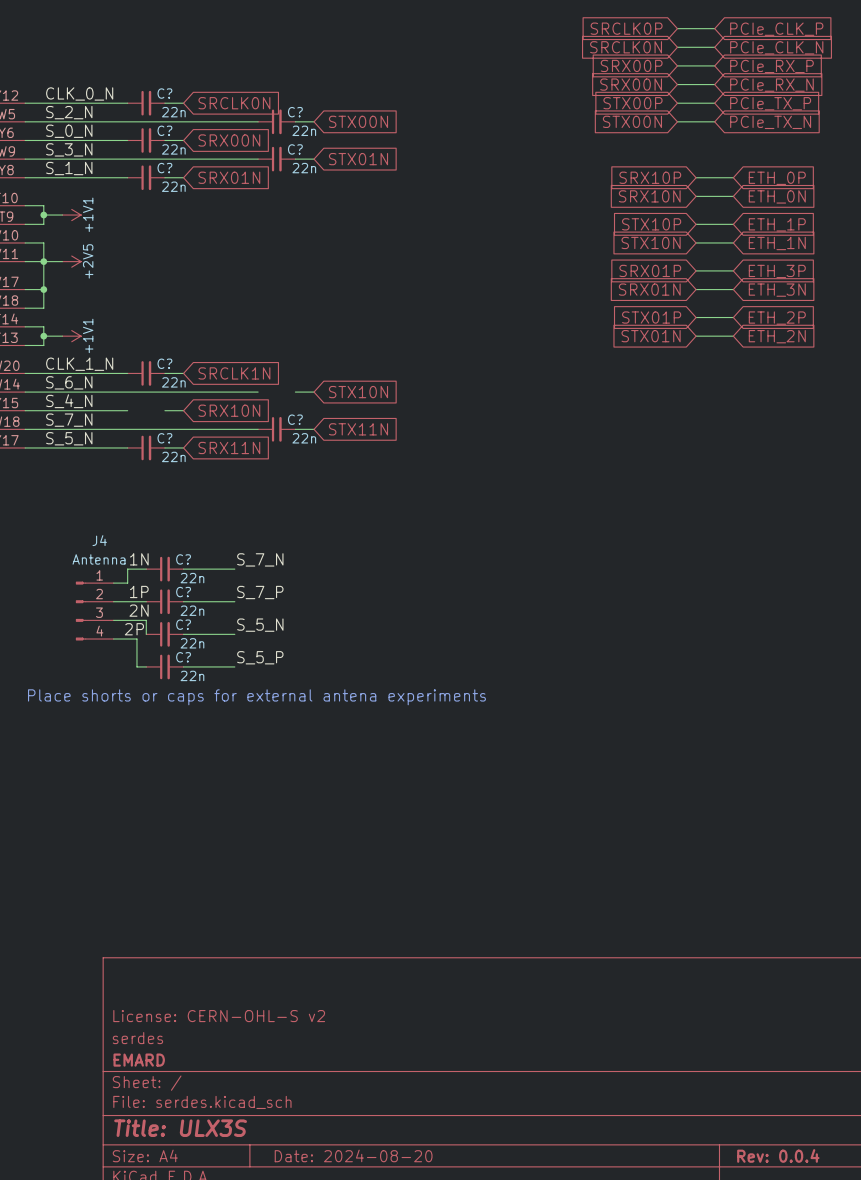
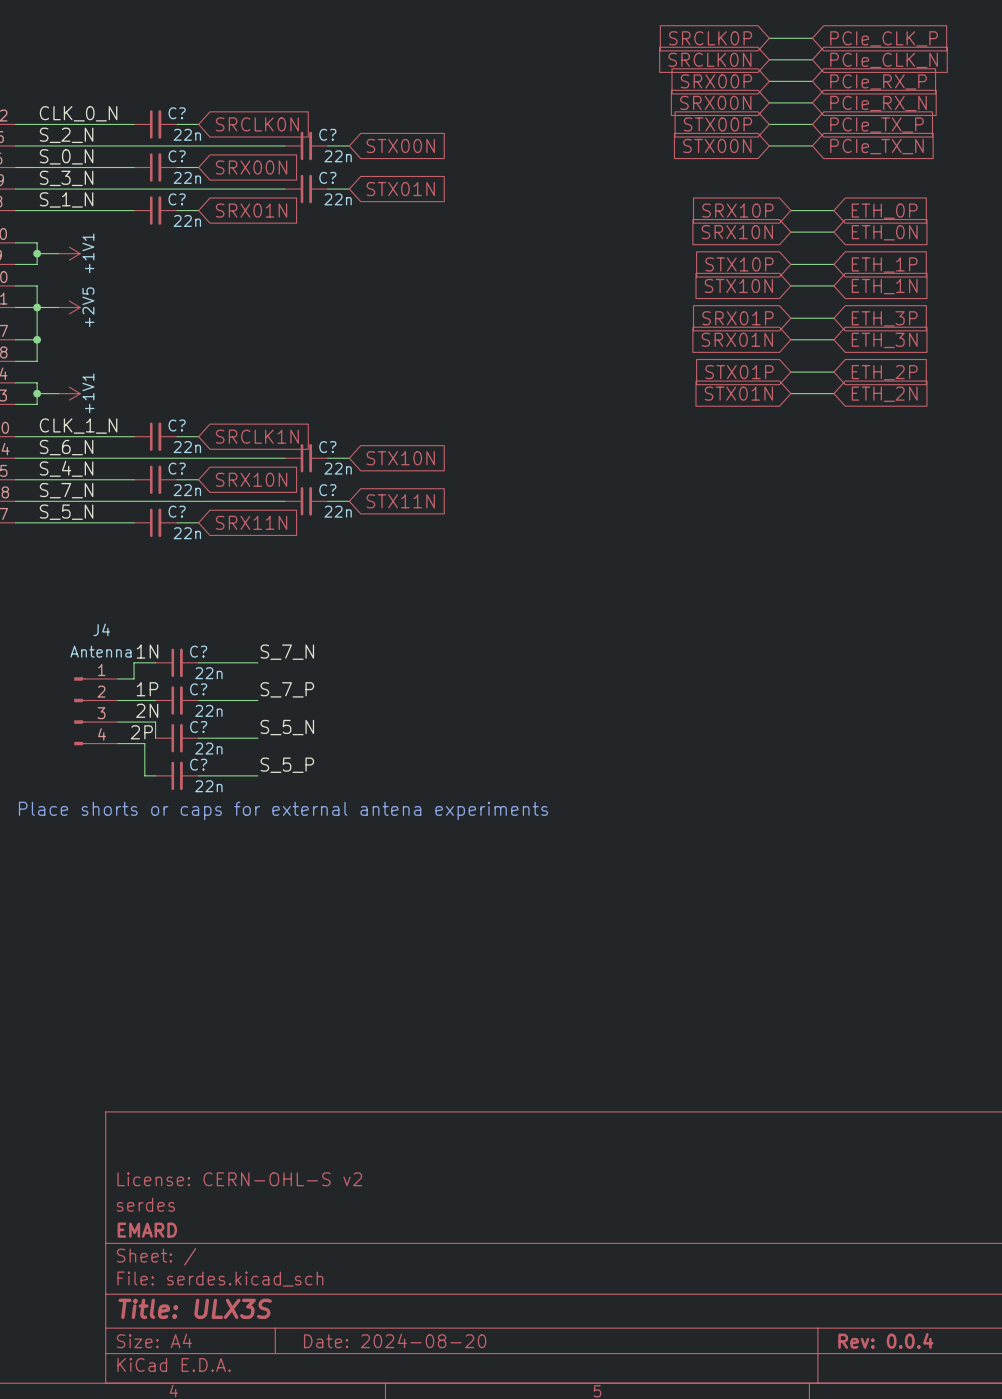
C?: none -> 22n (306, 458)
C?: none -> 22n (155, 479)

